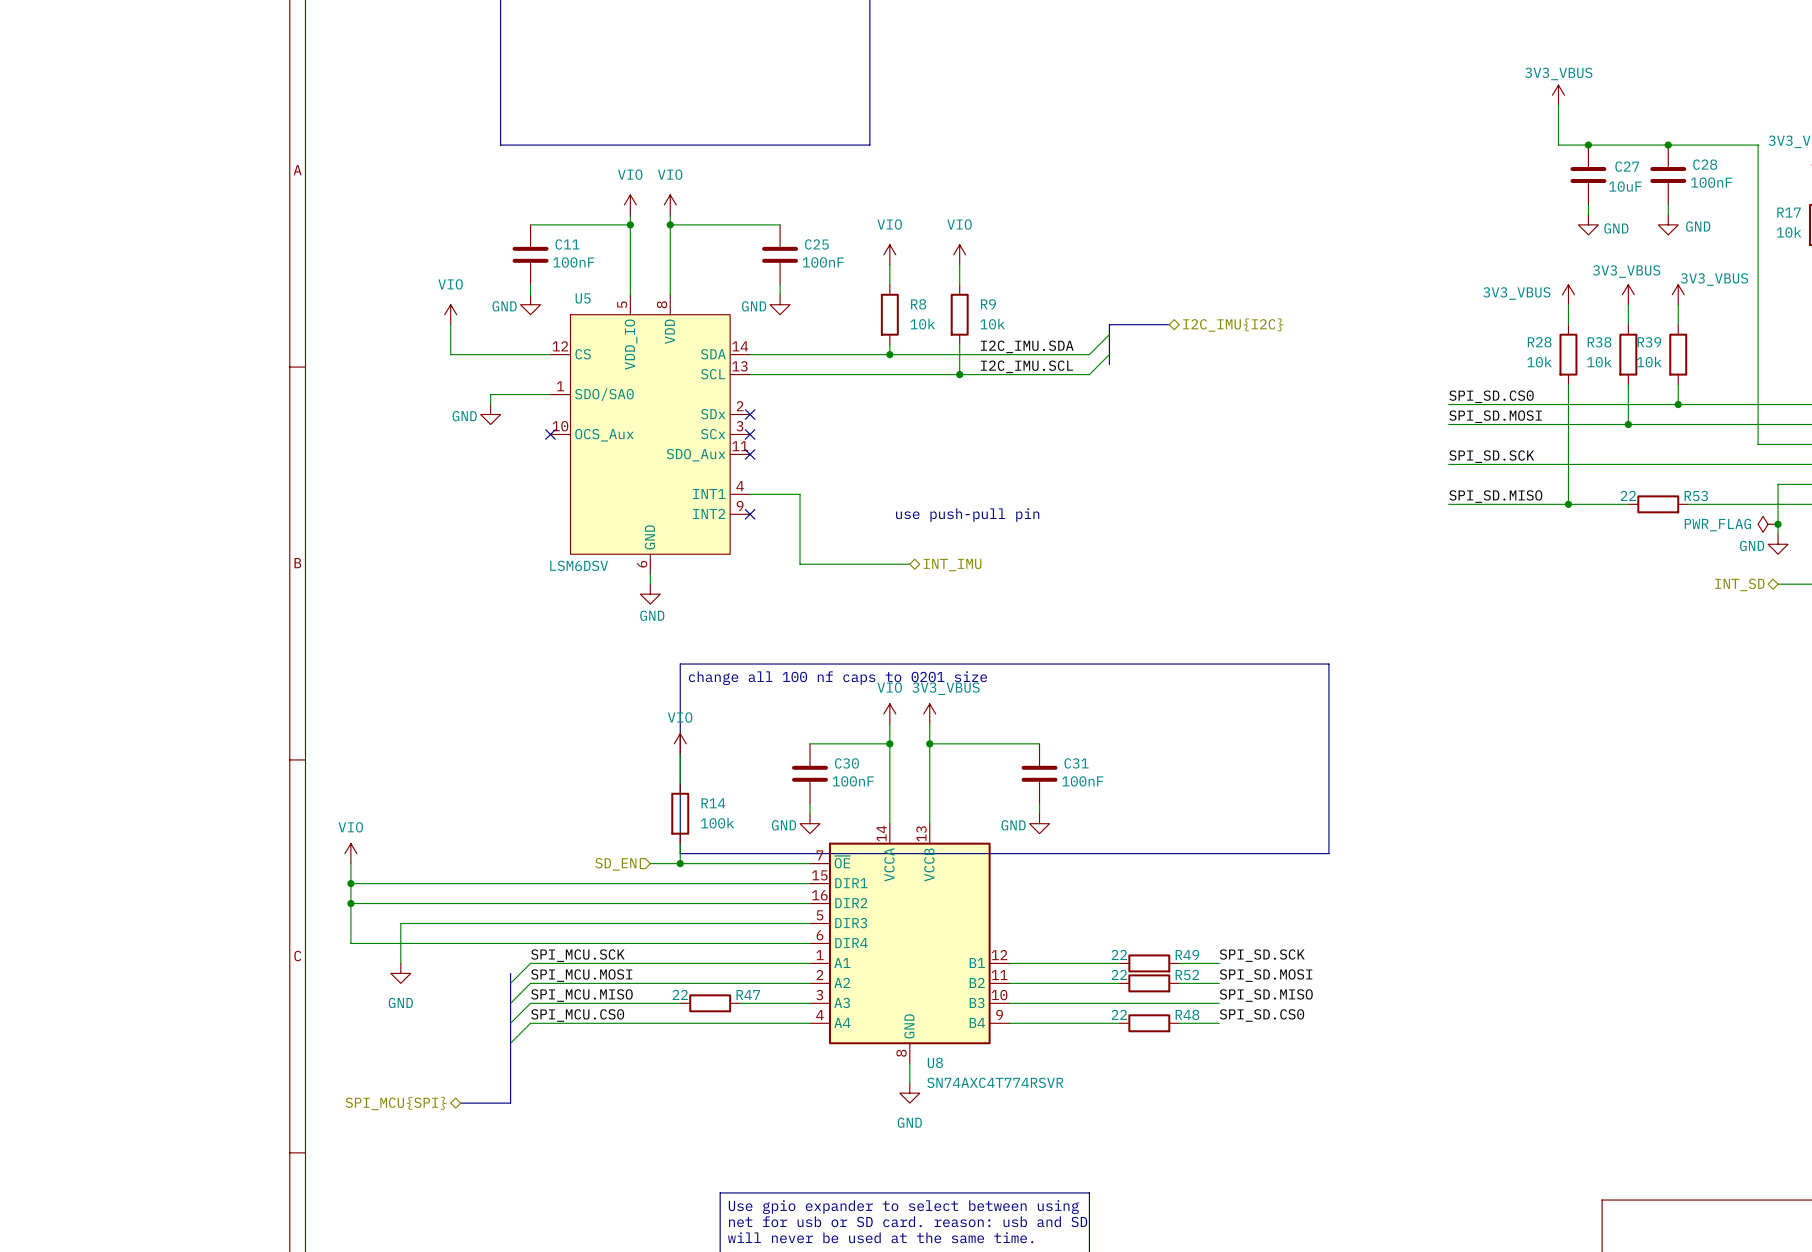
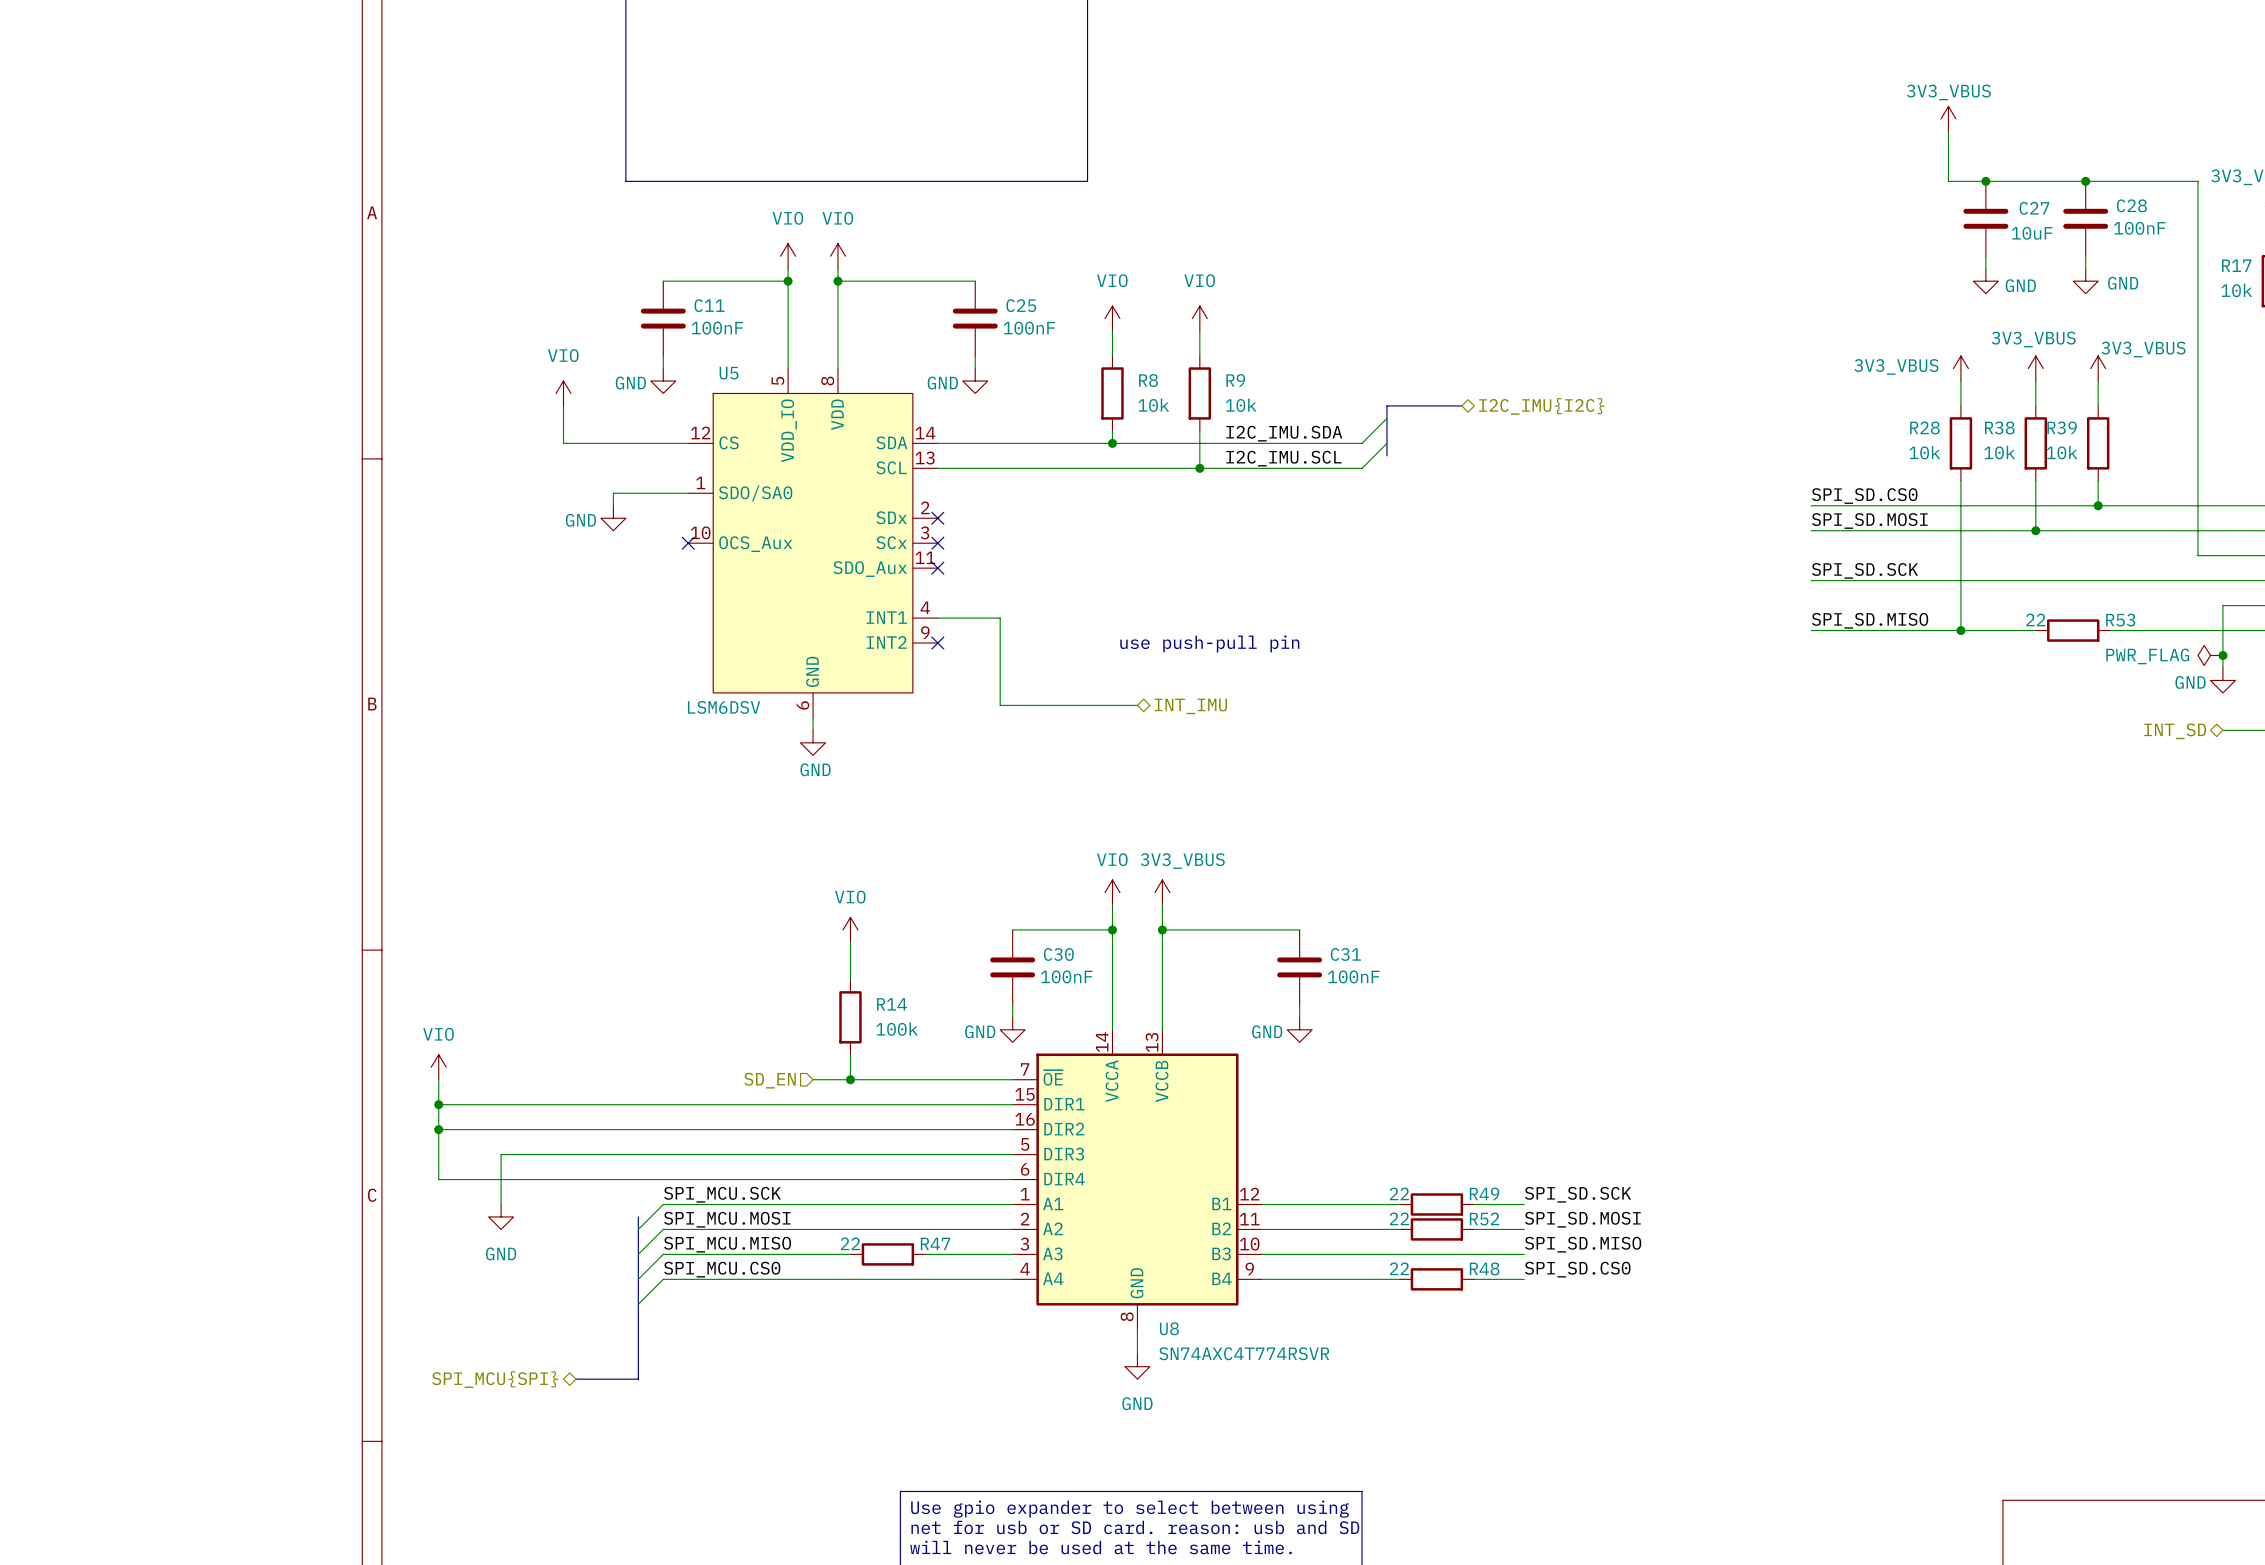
line: (680, 664) (1328, 664) (1328, 853) (680, 853) (680, 664) -> none
text: change all 100 nf caps to 0201 size (837, 678) -> none

